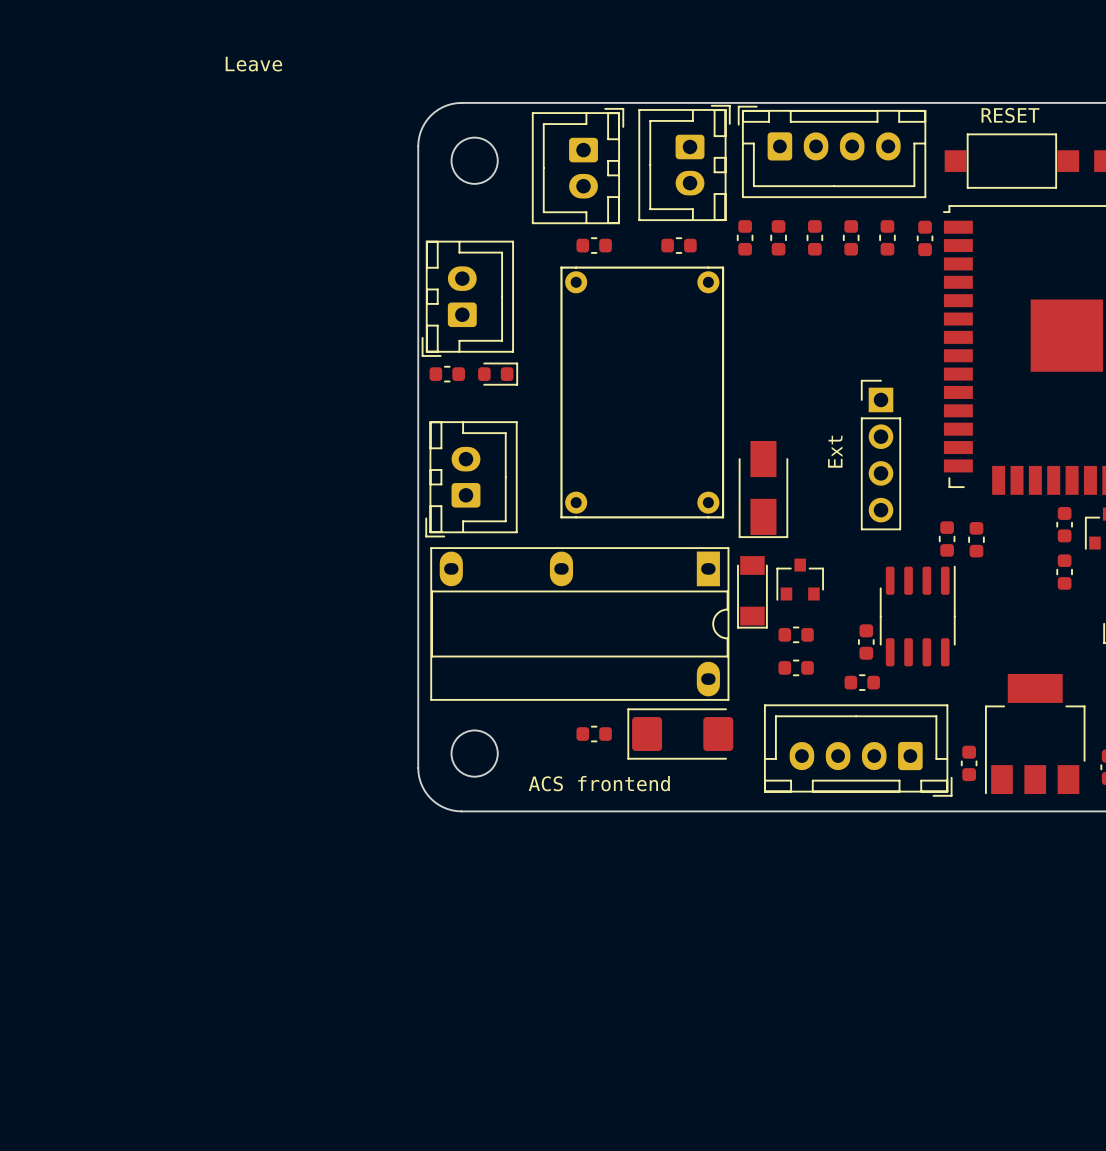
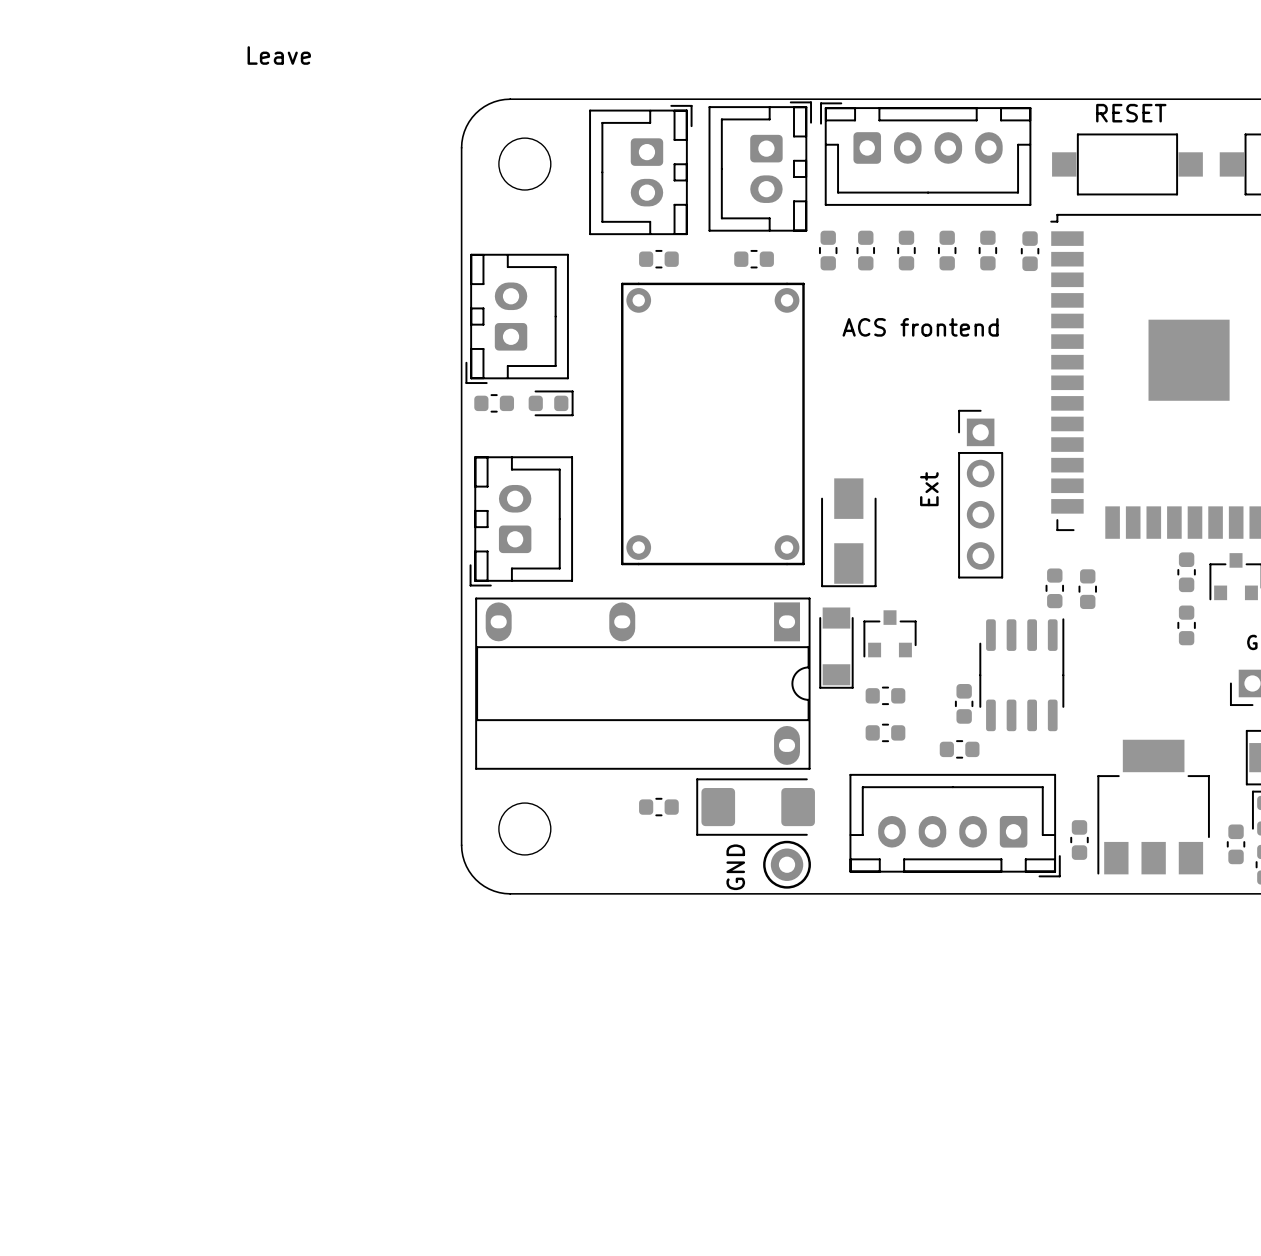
text: none -> ACS frontend (920, 327)
text: ACS frontend (599, 783) -> none
part: none -> (787, 864)
text: none -> GND (735, 867)

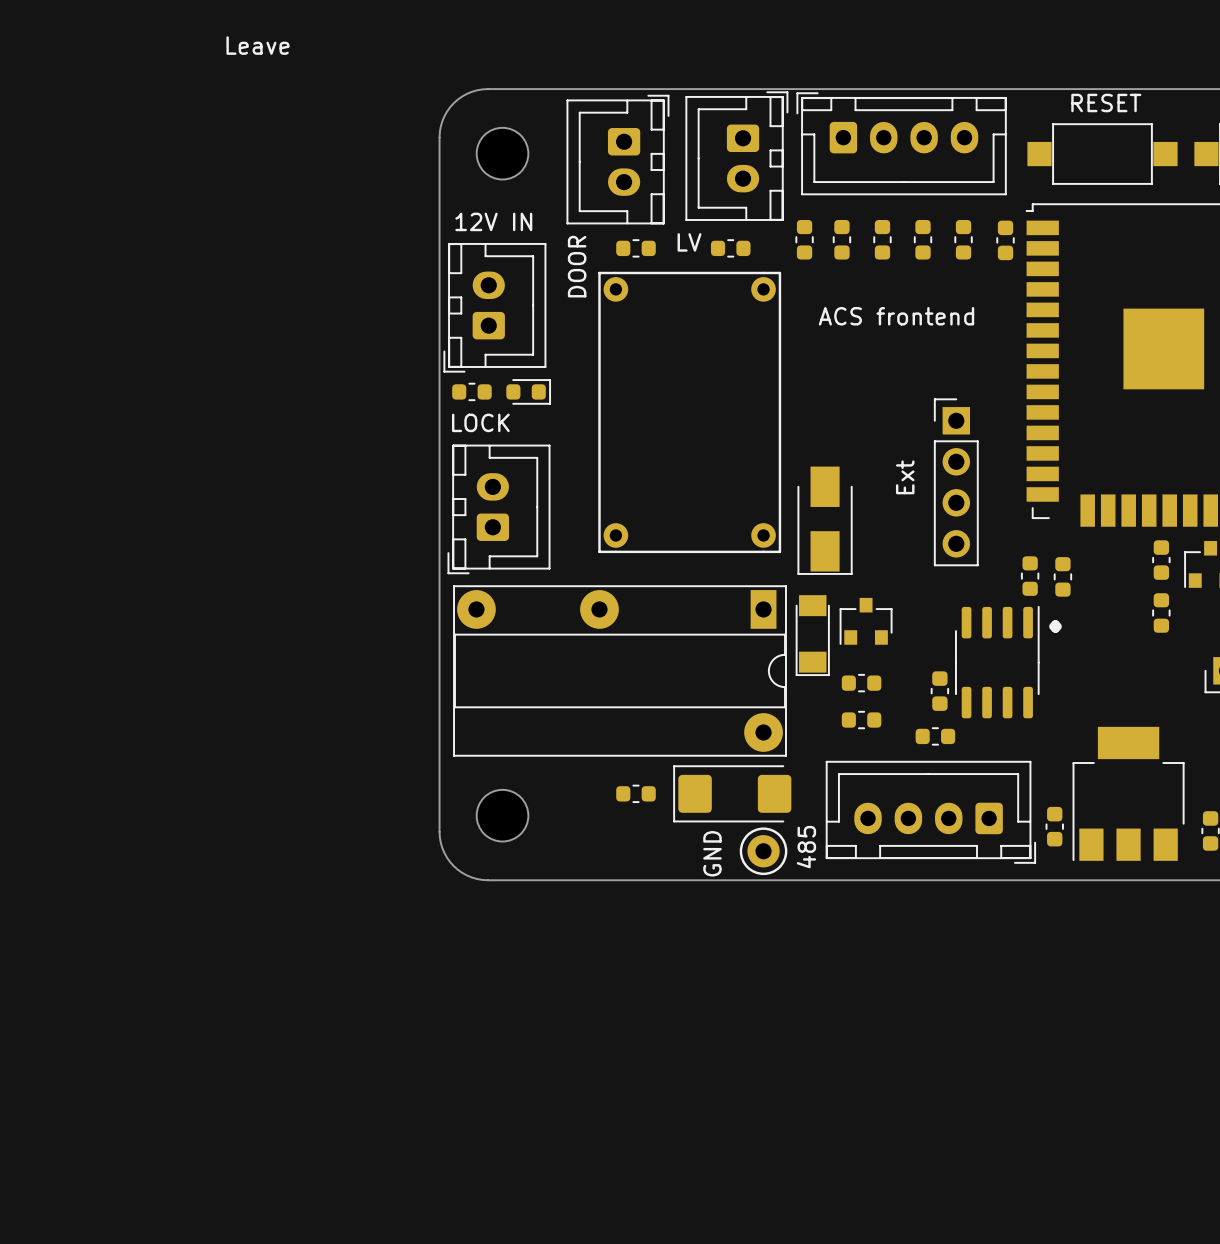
text: none -> 12V IN (493, 221)
text: none -> LV (689, 242)
text: none -> DOOR (577, 266)
text: none -> LOCK (480, 422)
part footprint: [475, 597, 811, 770] -> [453, 585, 787, 757]
text: none -> . (1055, 626)
text: none -> 485 (806, 847)

